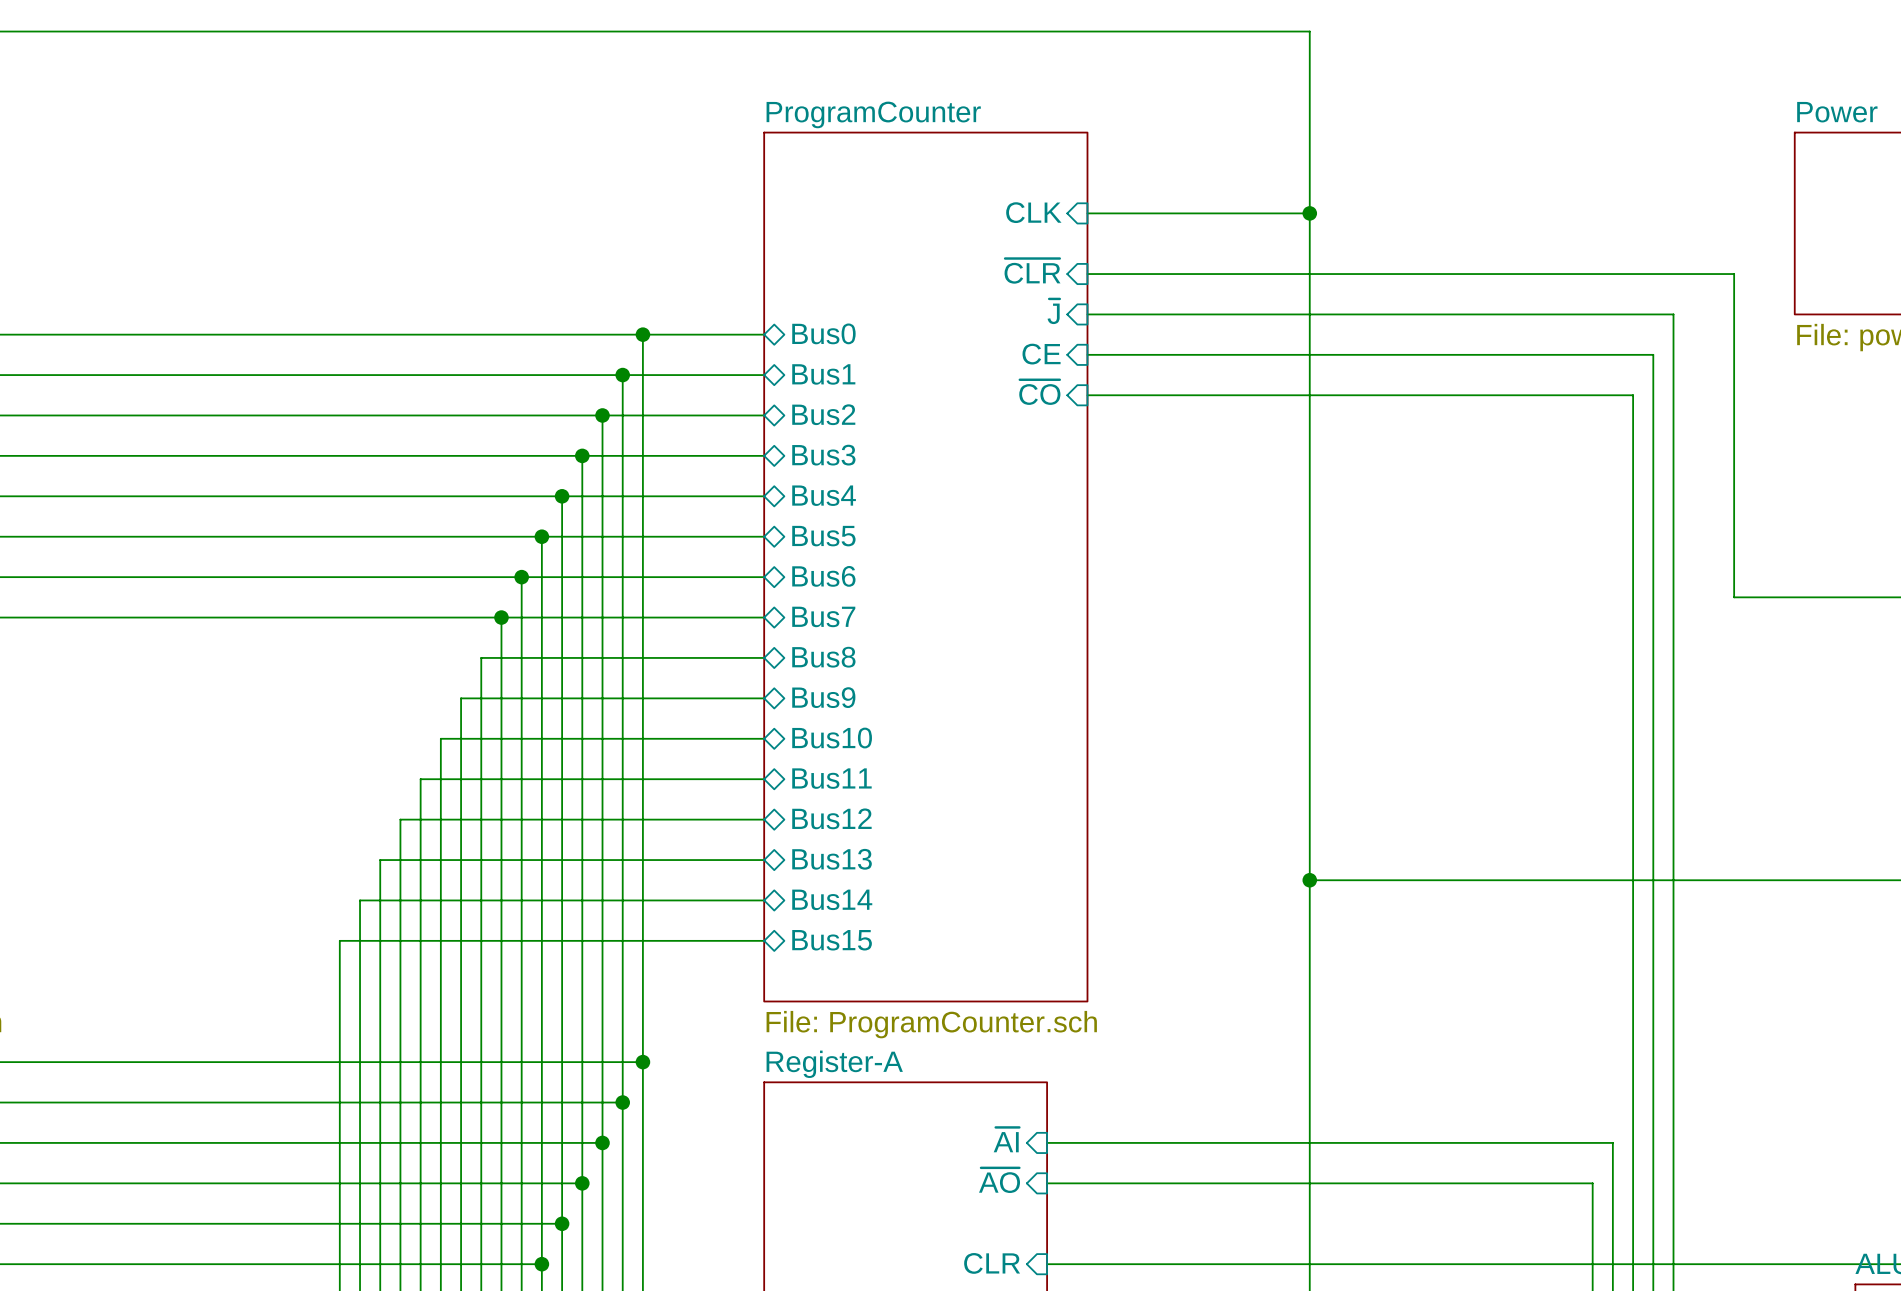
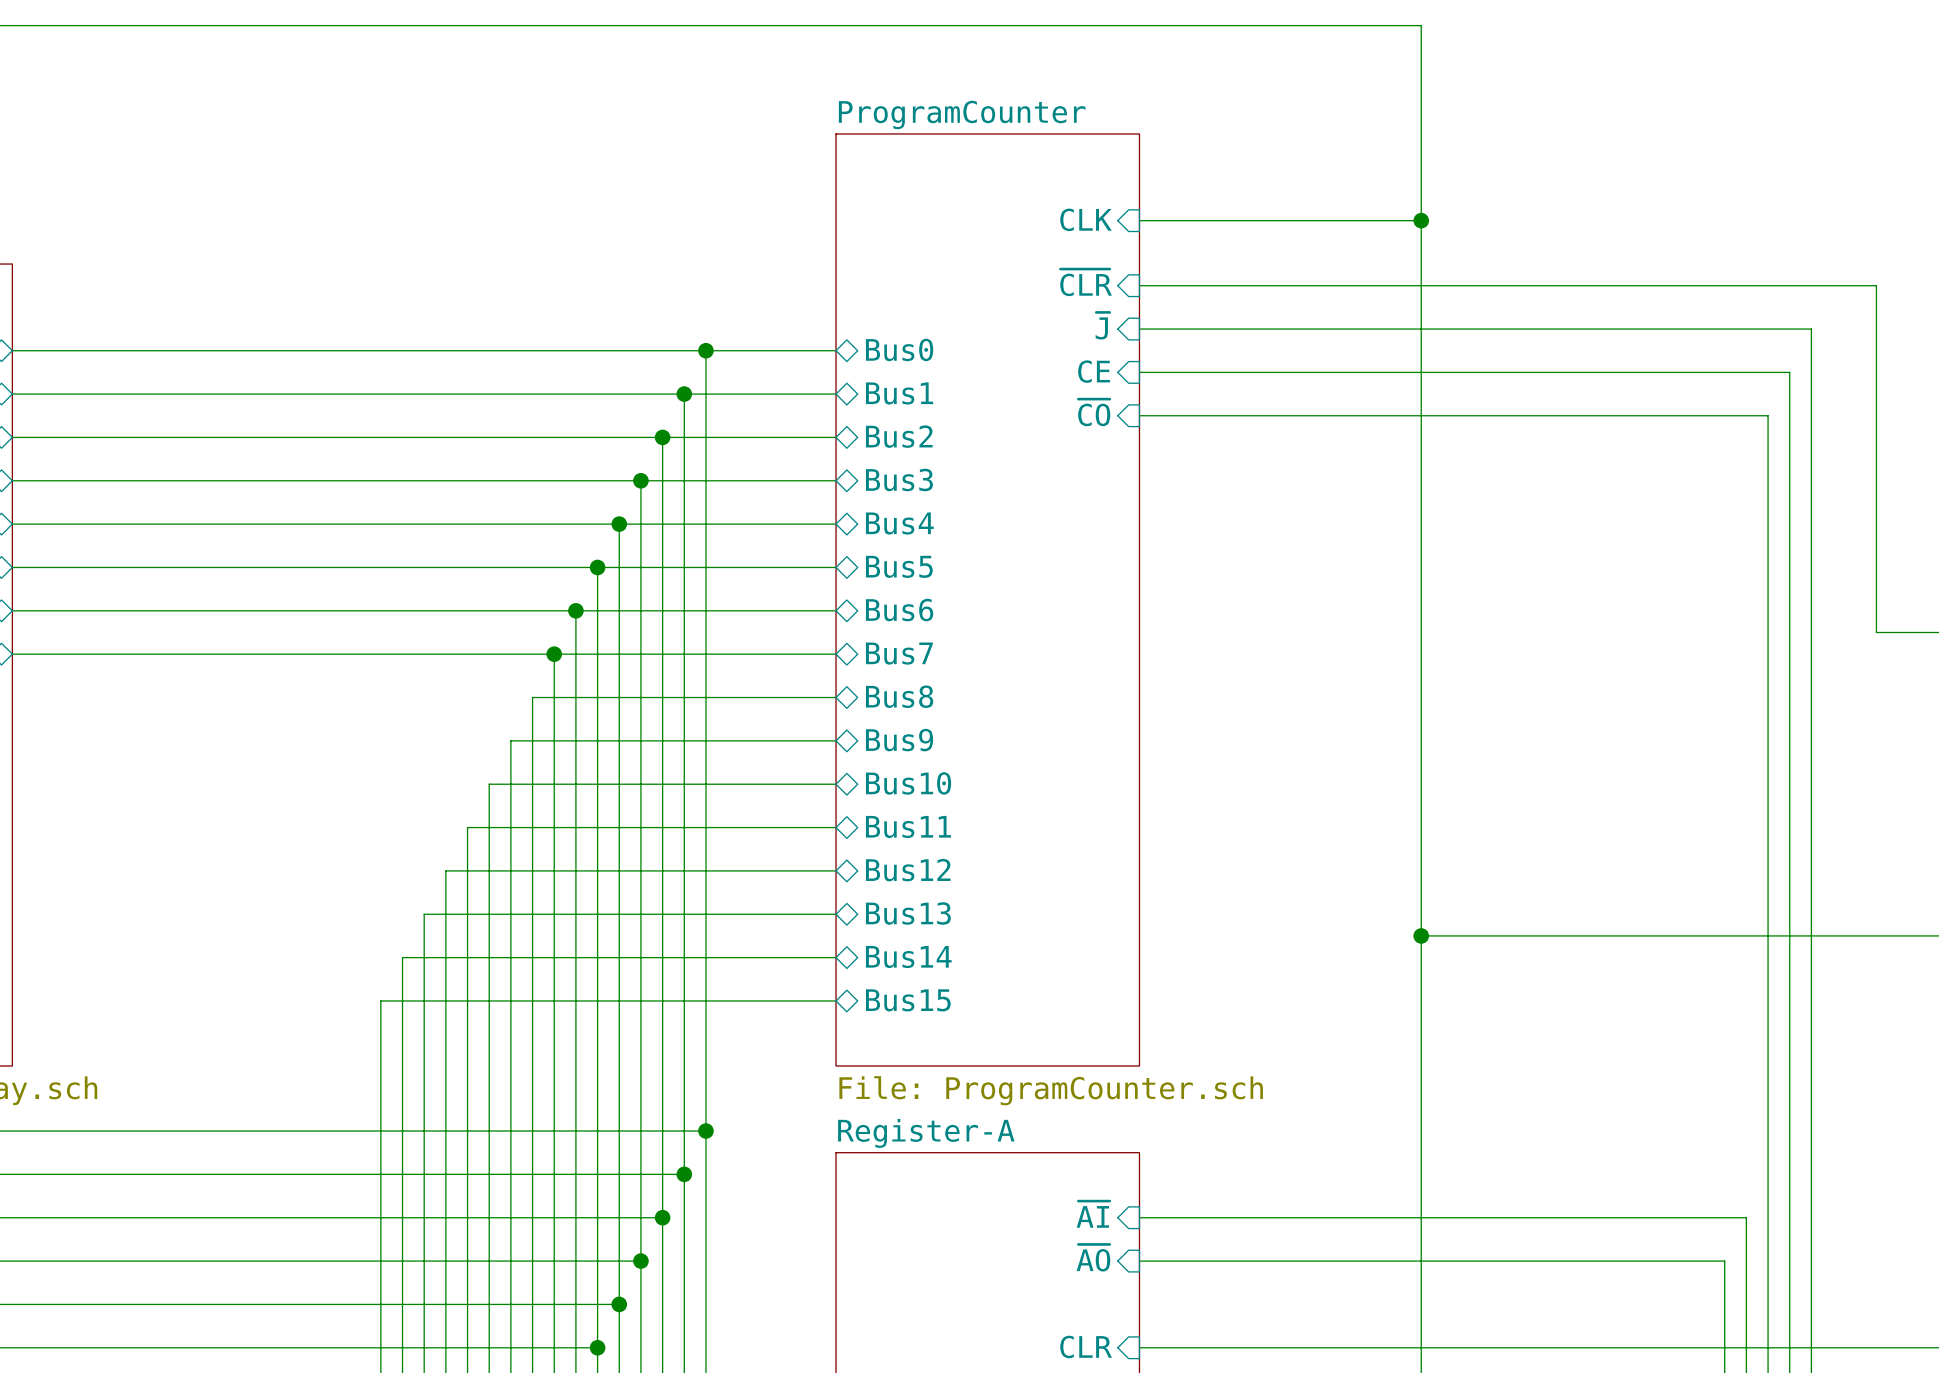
sheet pin position: CLK (1033, 212) -> CLK (1086, 219)
wire: none -> (1139, 220) (1182, 220)
sheet pin position: ~{CLR} (1032, 271) -> ~{CLR} (1086, 282)
wire: none -> (1139, 285) (1182, 285)
sheet pin position: ~{J} (1053, 311) -> ~{J} (1102, 325)
wire: none -> (1139, 329) (1182, 329)
sheet pin position: CE (1041, 354) -> CE (1094, 371)
wire: none -> (1139, 372) (1182, 372)
sheet pin position: ~{CO} (1039, 392) -> ~{CO} (1094, 412)
wire: none -> (1139, 415) (1182, 415)
sheet ProgramCounter: none -> File: ProgramCounter.sch (987, 599)
sheet ProgramCounter: File: ProgramCounter.sch (925, 567) -> none

